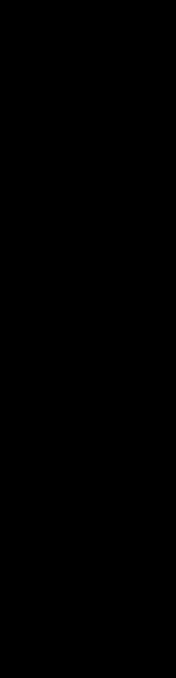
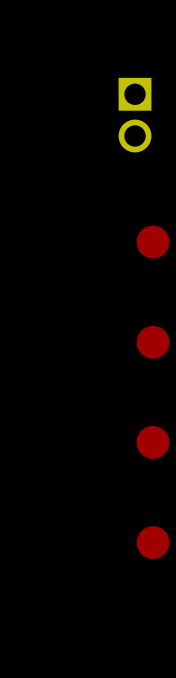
part: none -> (135, 115)
part: none -> (153, 242)
part: none -> (153, 342)
part: none -> (153, 442)
part: none -> (153, 542)

